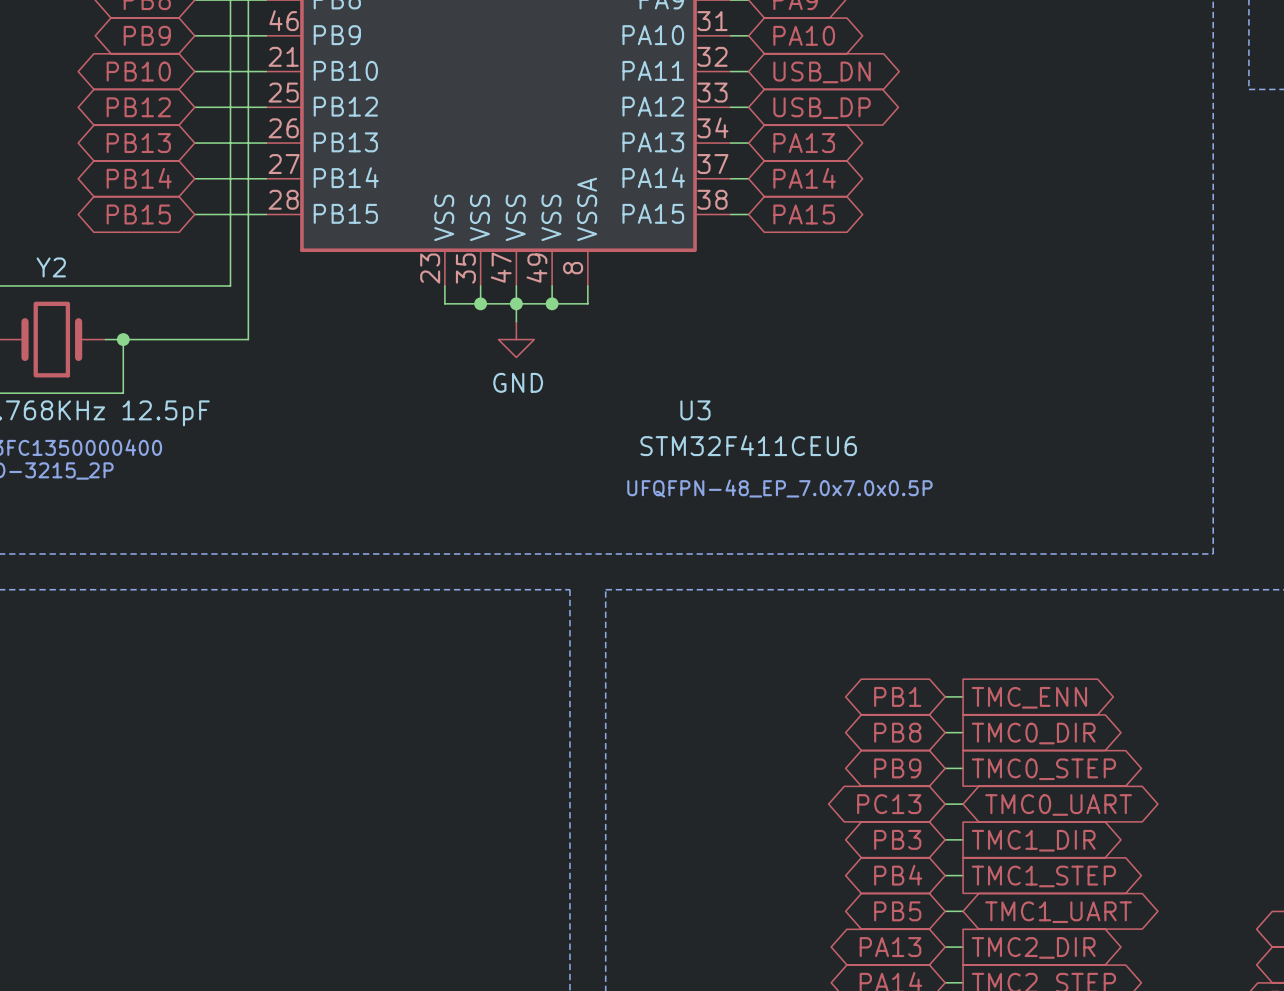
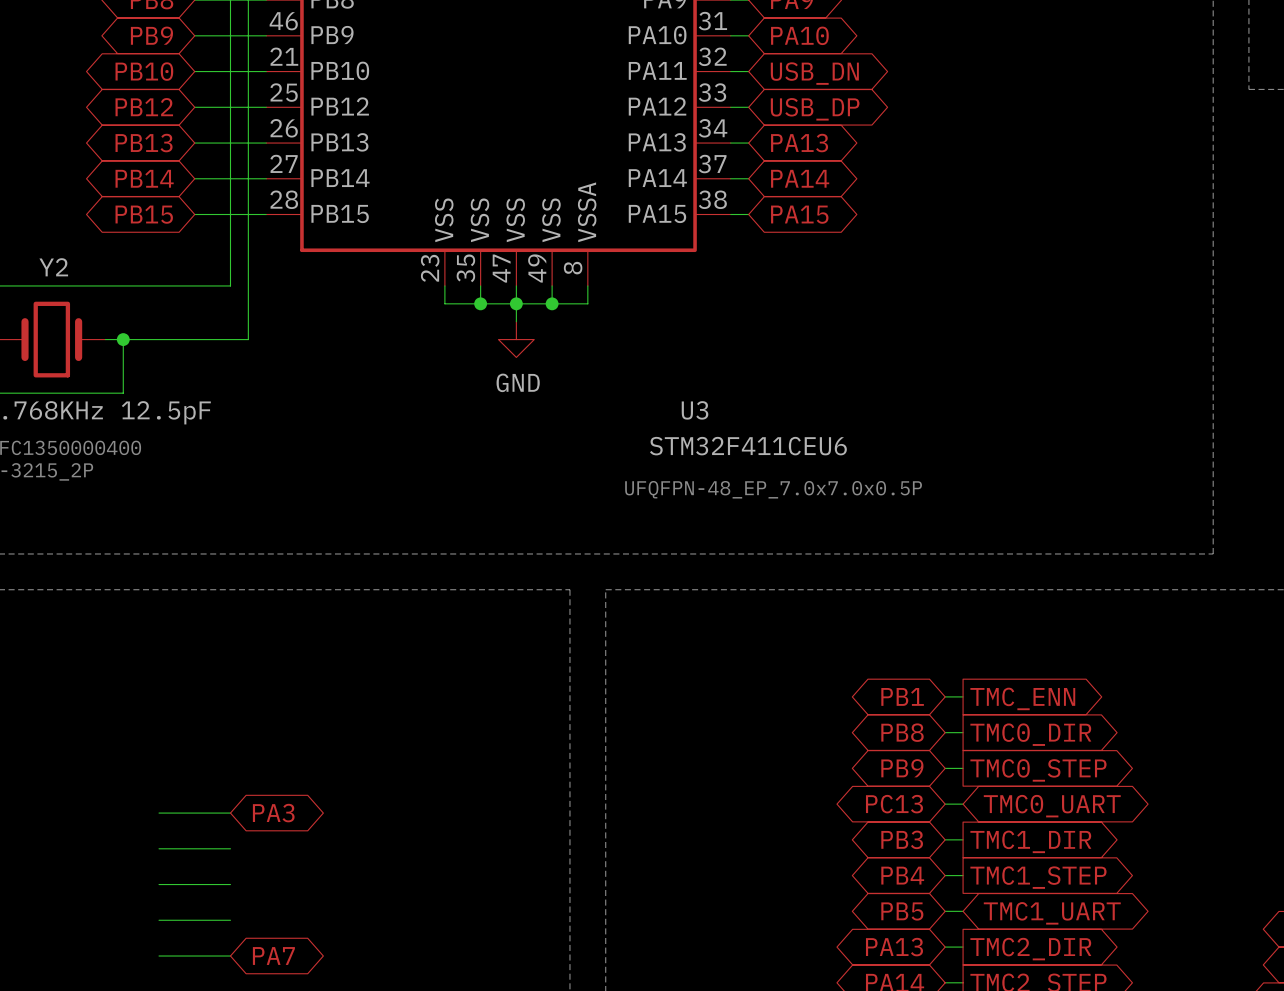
wire: none -> (159, 813) (230, 813)
global label: none -> PA3 (273, 813)
wire: none -> (159, 848) (230, 848)
wire: none -> (159, 884) (230, 884)
wire: none -> (159, 920) (230, 920)
wire: none -> (159, 956) (230, 956)
global label: none -> PA7 (273, 956)

